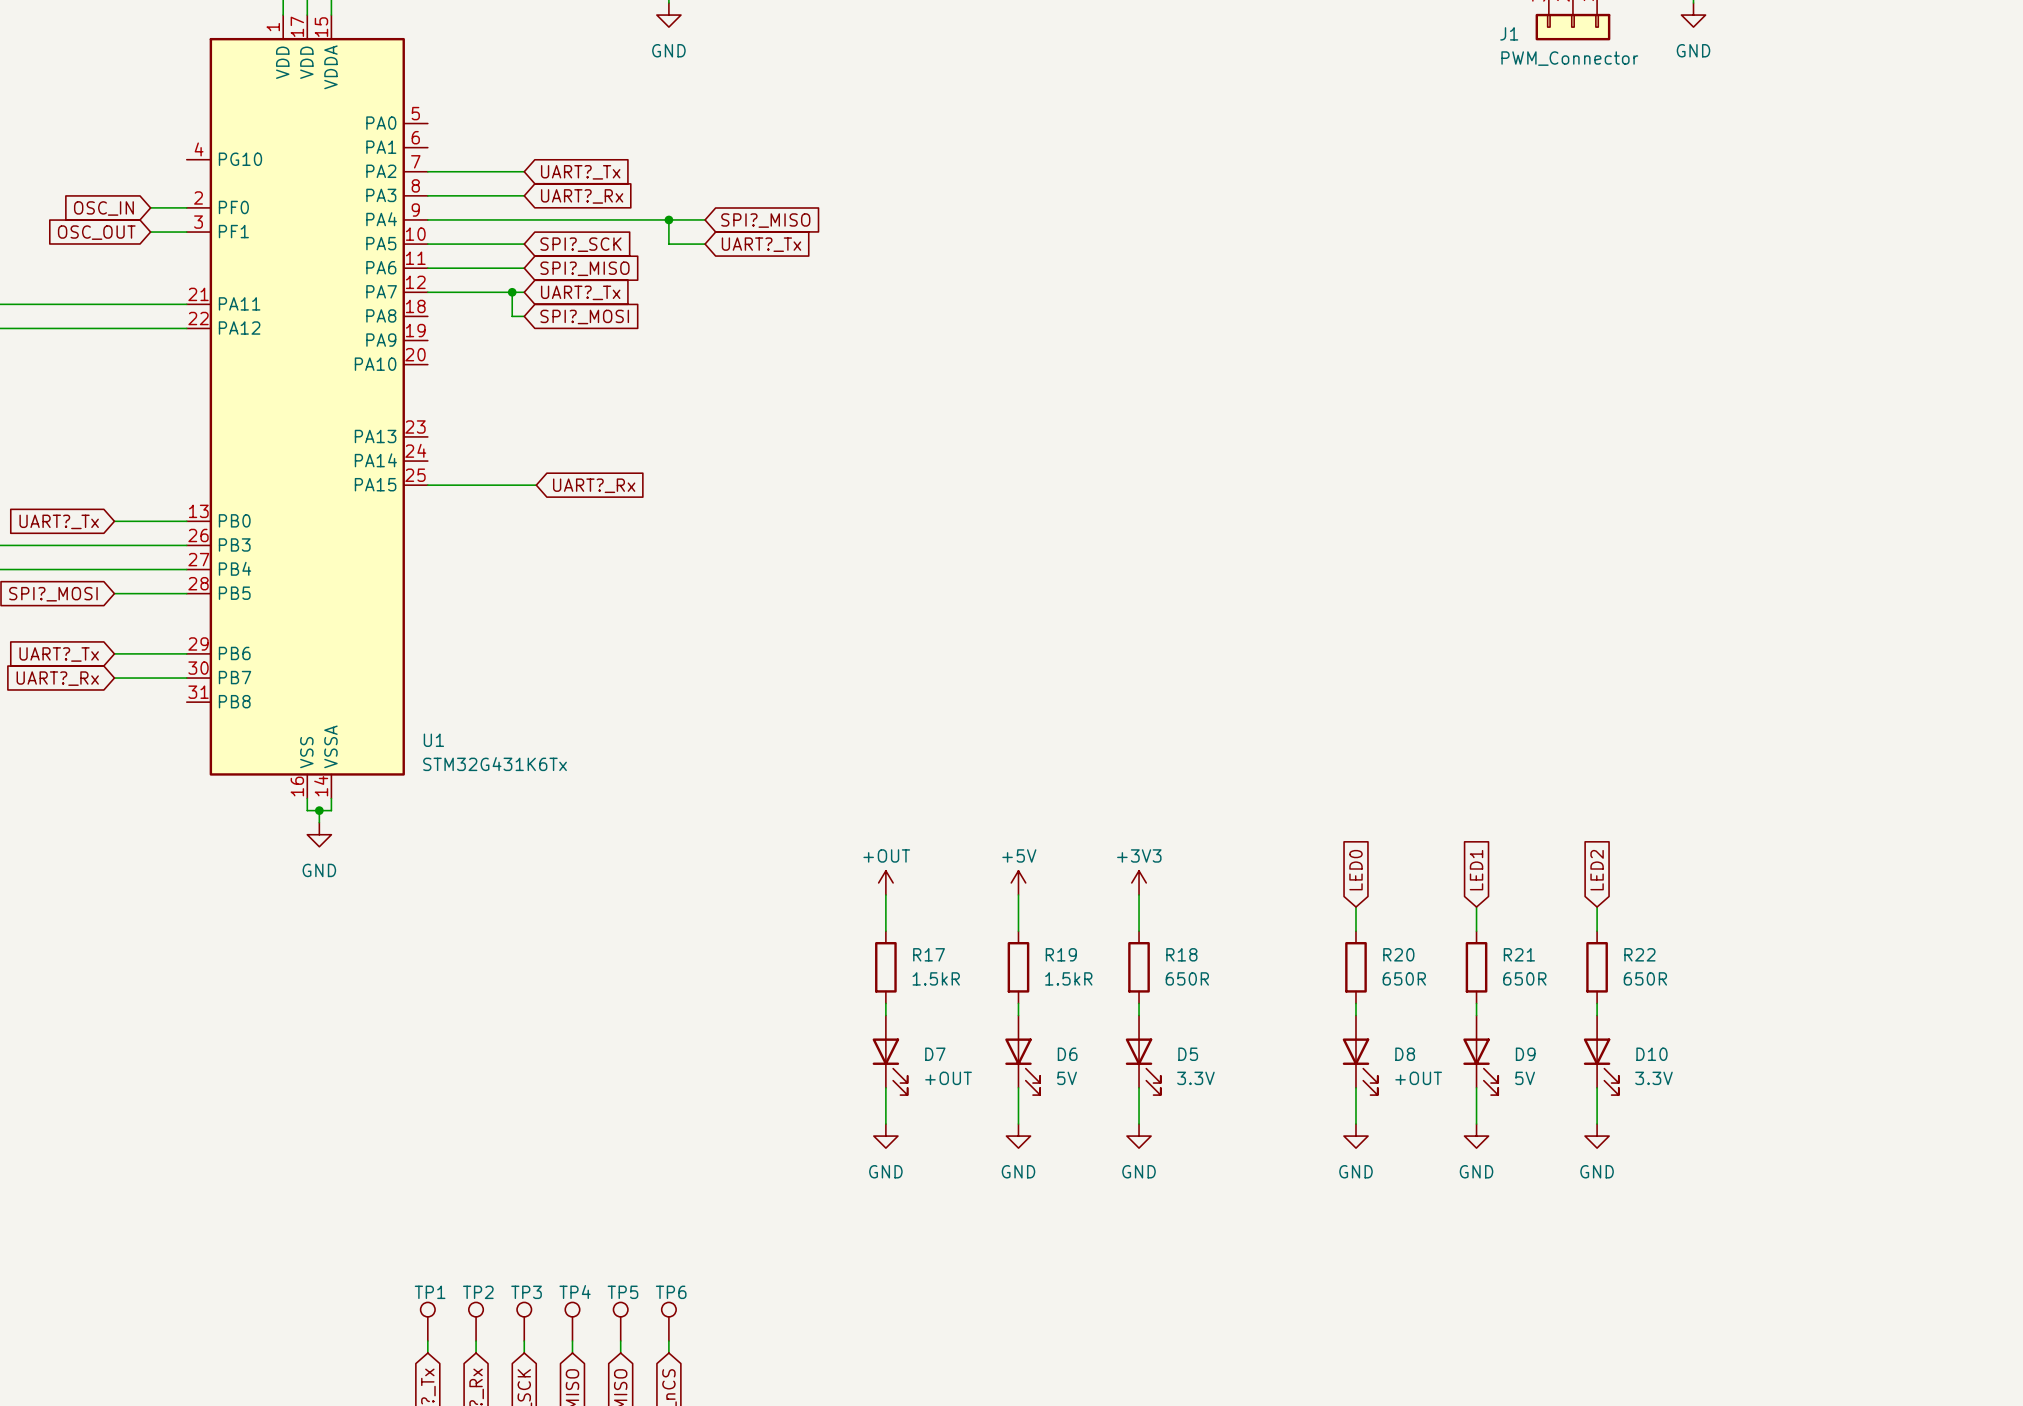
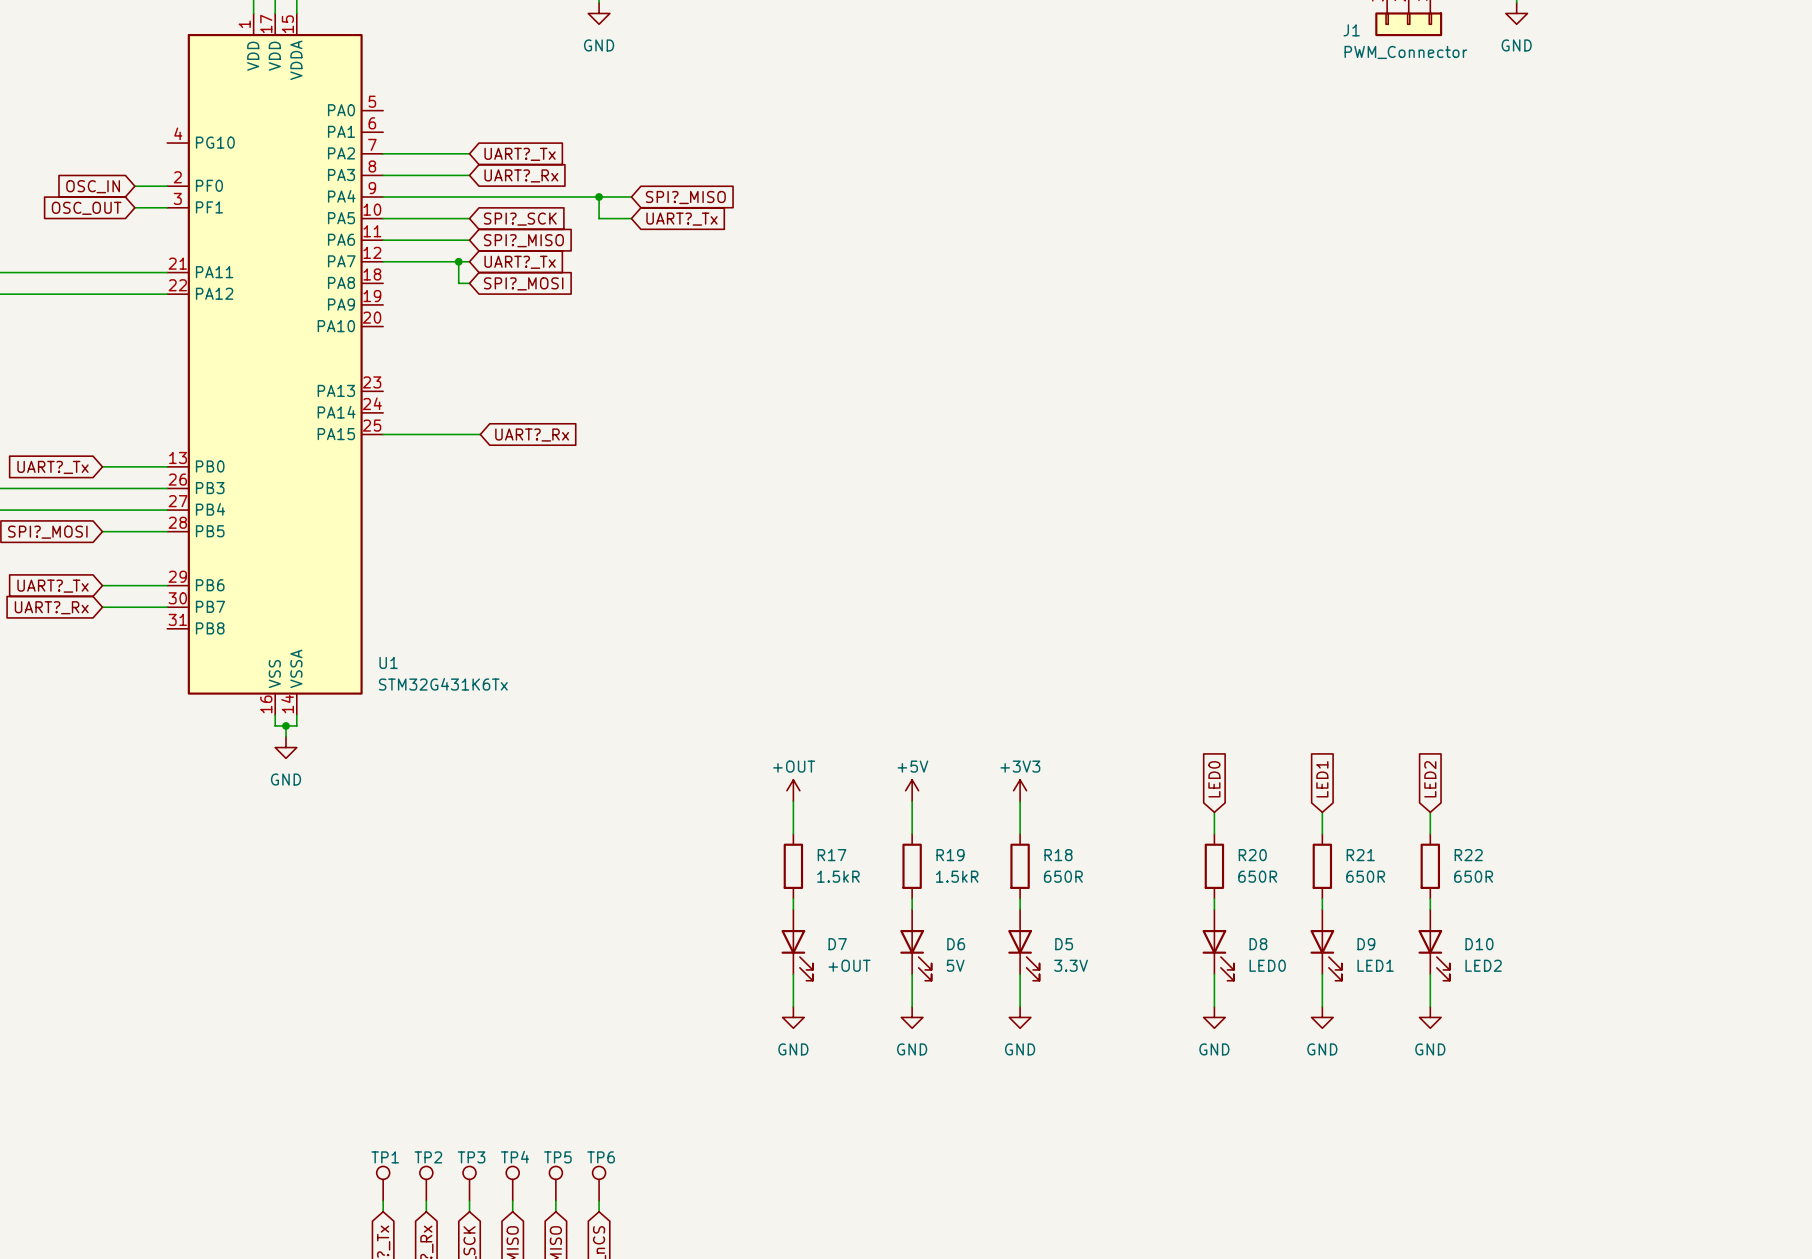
D8 value: +OUT (1418, 1078) -> LED0 (1267, 965)
D9 value: 5V (1525, 1078) -> LED1 (1375, 965)
D10 value: 3.3V (1653, 1078) -> LED2 (1483, 965)

